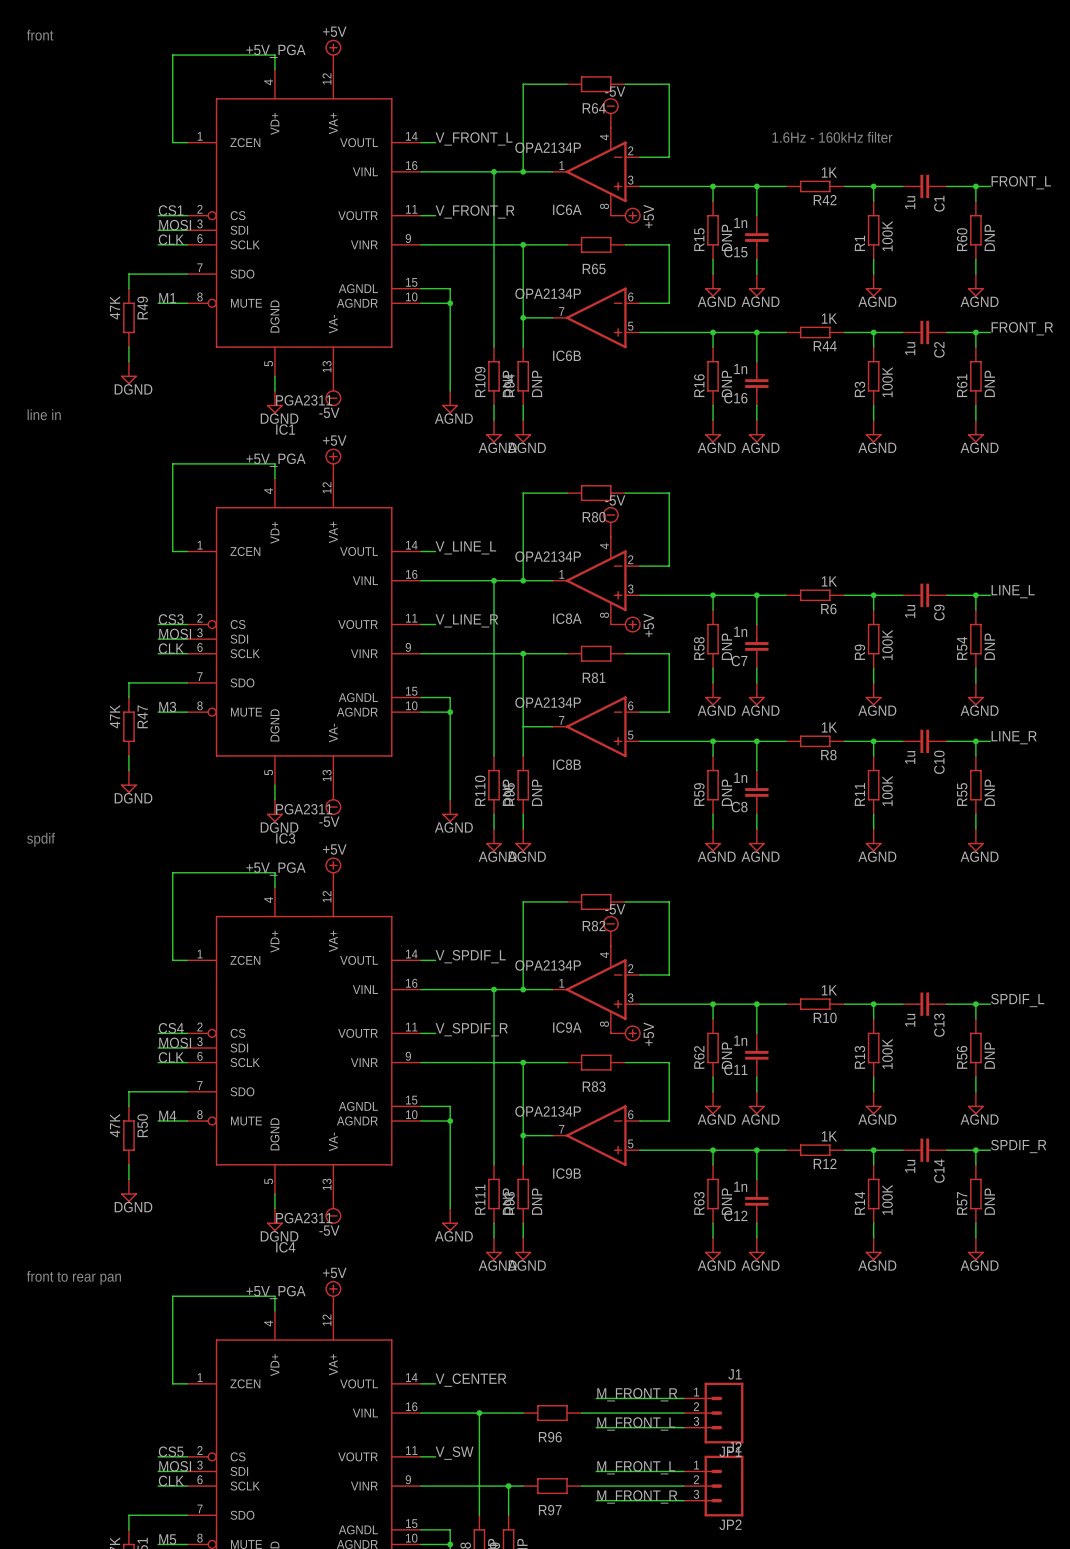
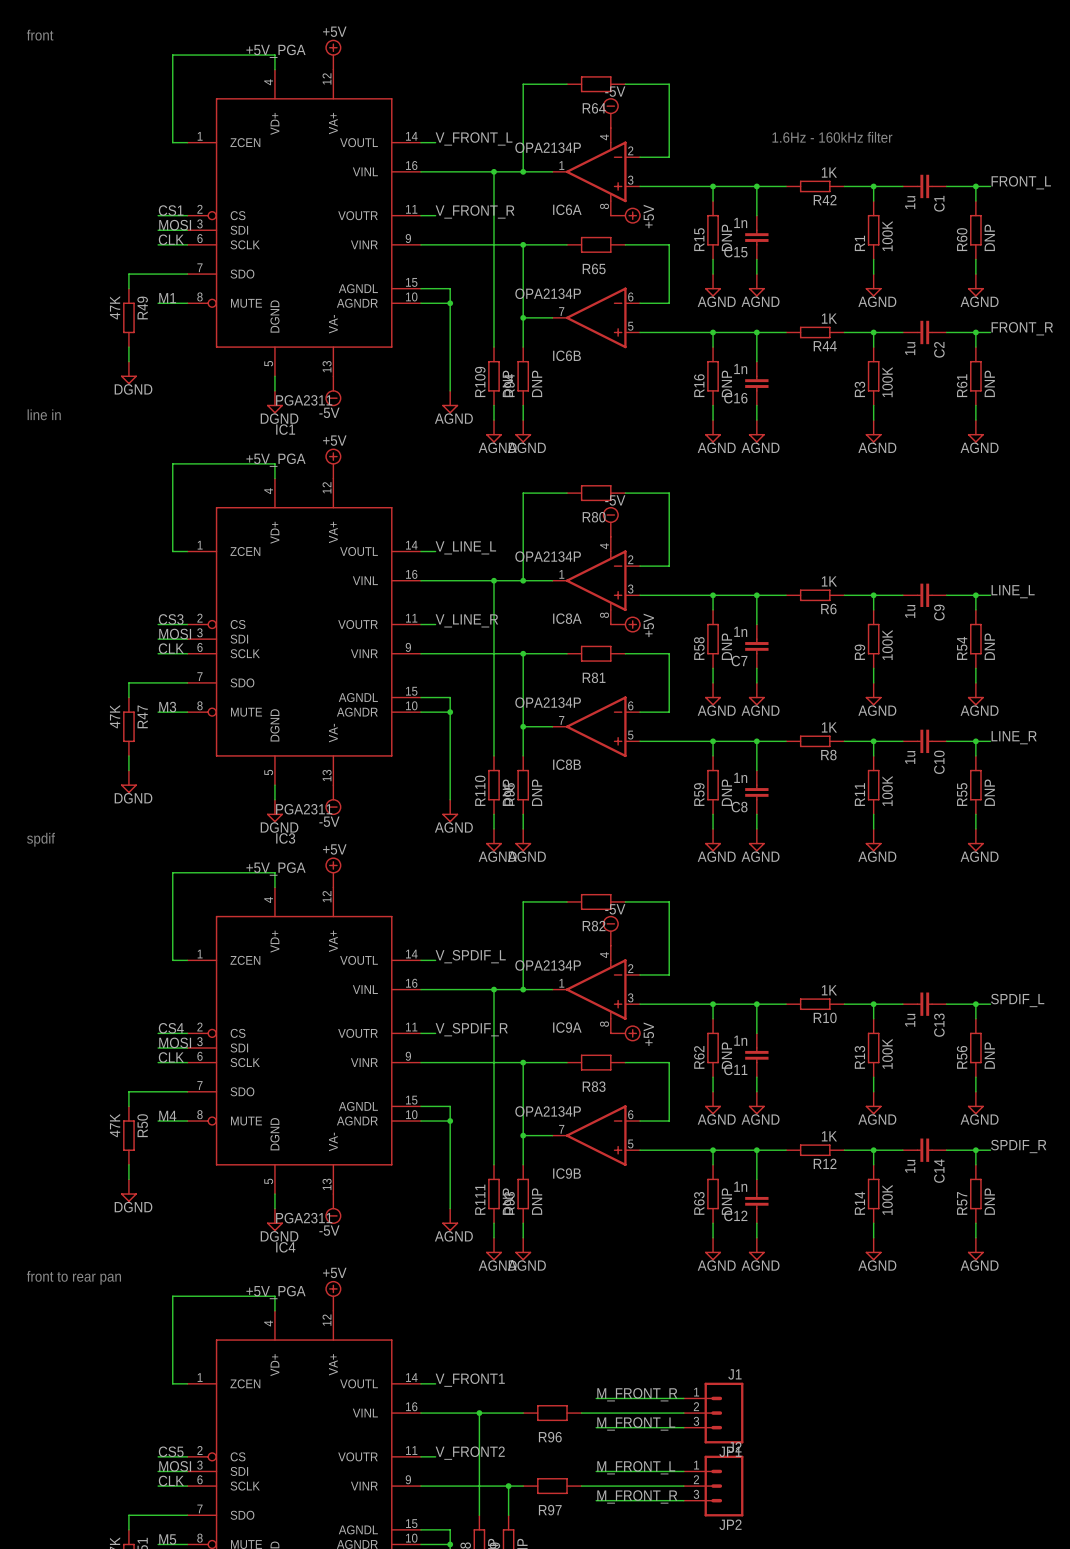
junction: none -> (523, 726)
label: V_CENTER (470, 1380) -> V_FRONT1 (470, 1380)
label: V_SW (454, 1453) -> V_FRONT2 (470, 1453)

